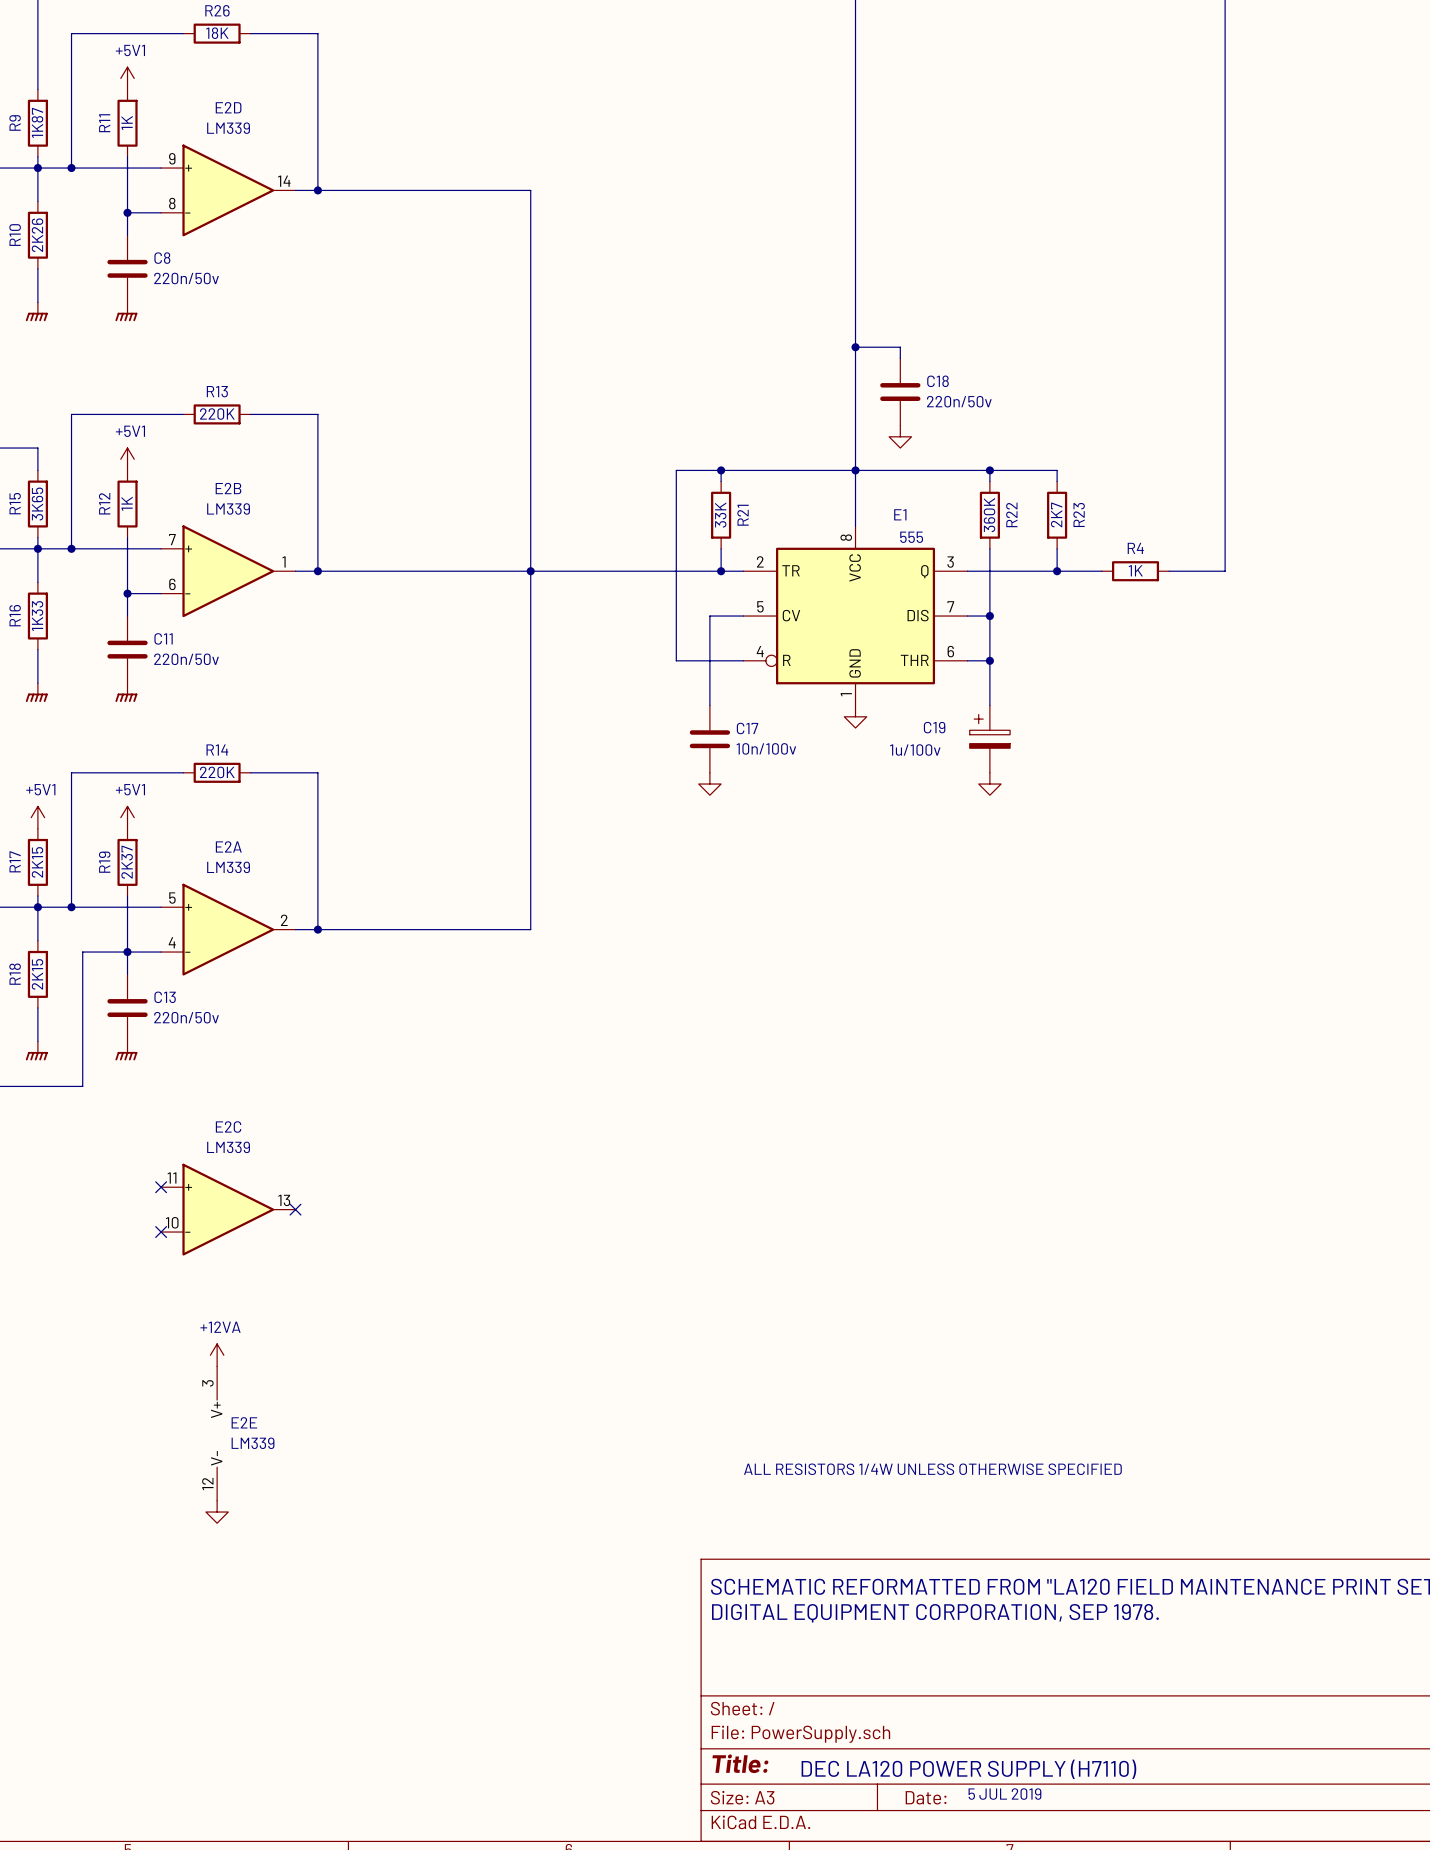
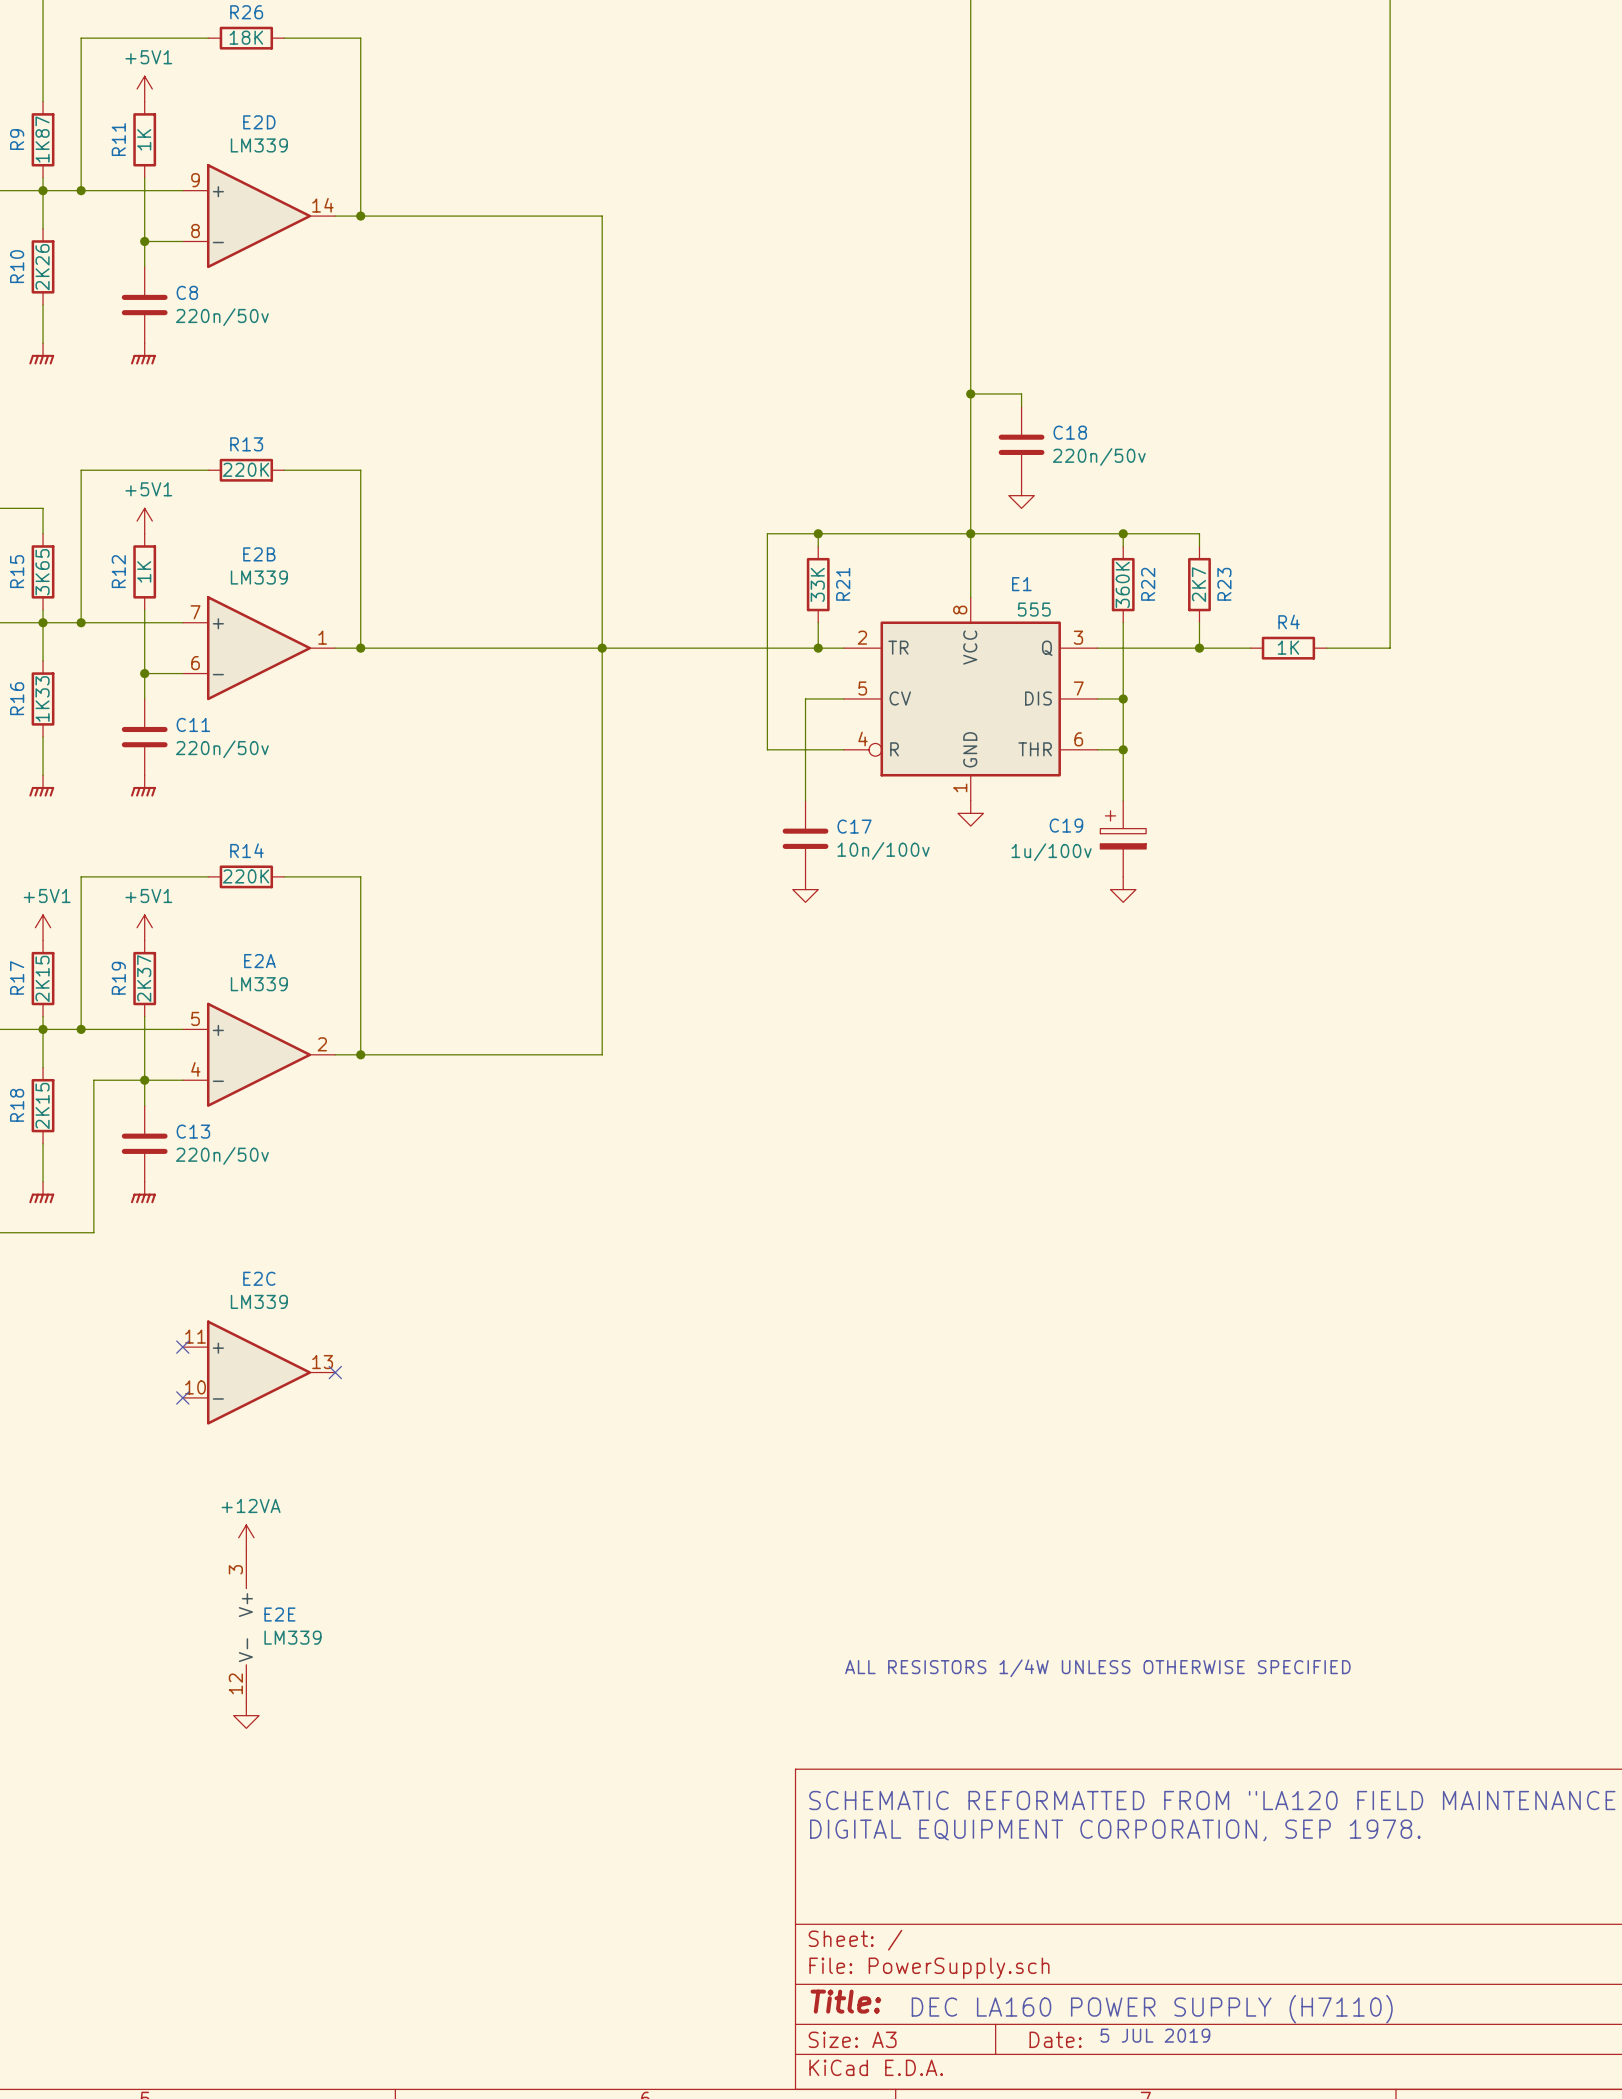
text: DEC LA120 POWER SUPPLY (H7110) (968, 1769) -> DEC LA160 POWER SUPPLY (H7110) (1152, 2009)

